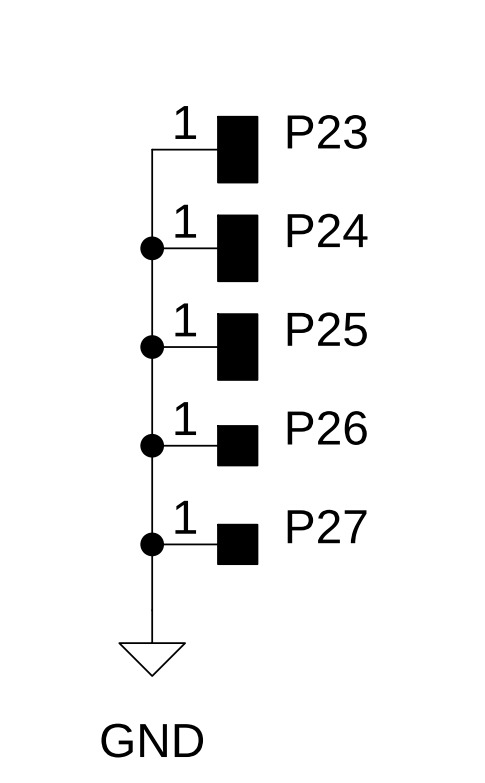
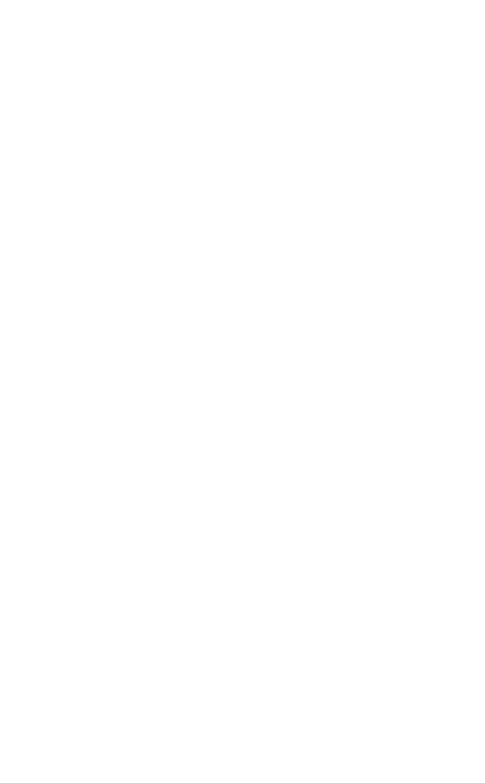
wire: (152, 149) (152, 610) -> none
P23: (204, 149) -> none
junction: (152, 248) -> none
P24: (204, 248) -> none
junction: (152, 347) -> none
P25: (204, 347) -> none
junction: (152, 445) -> none
P26: (204, 445) -> none
junction: (152, 544) -> none
P27: (204, 544) -> none
power symbol: GND (152, 643) -> none

